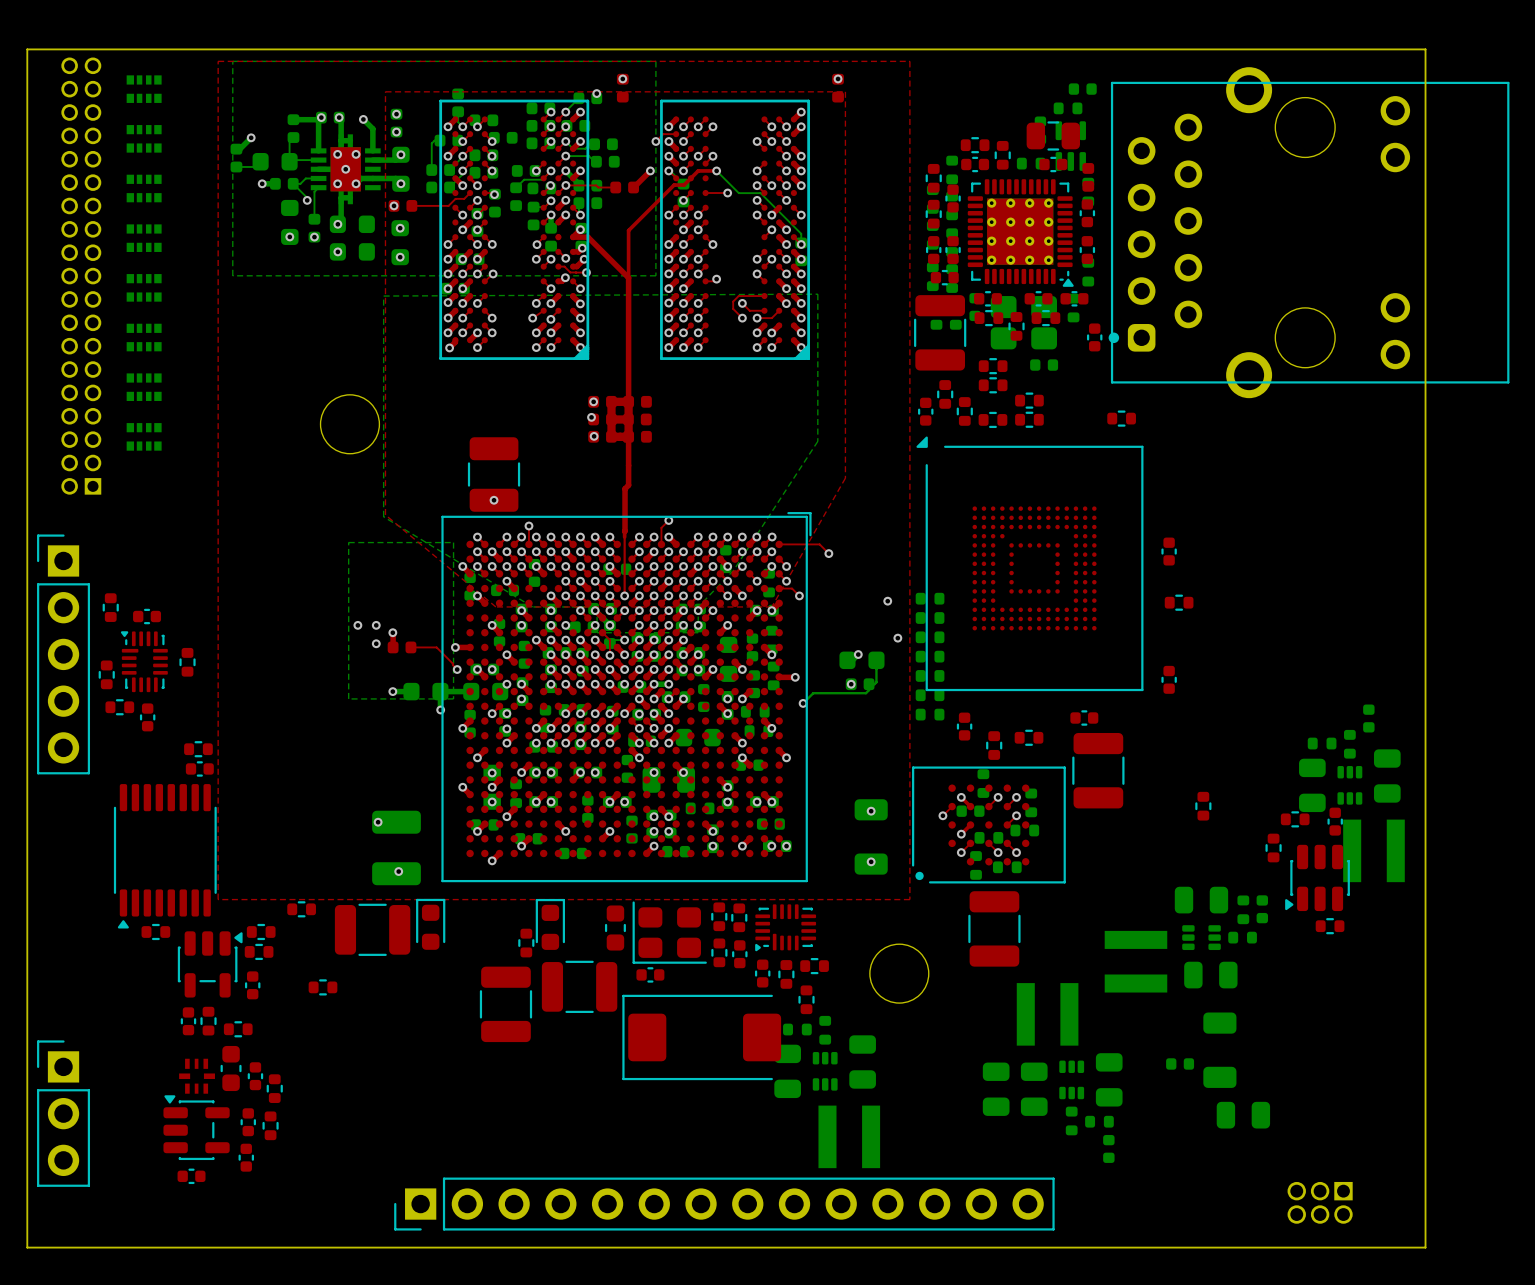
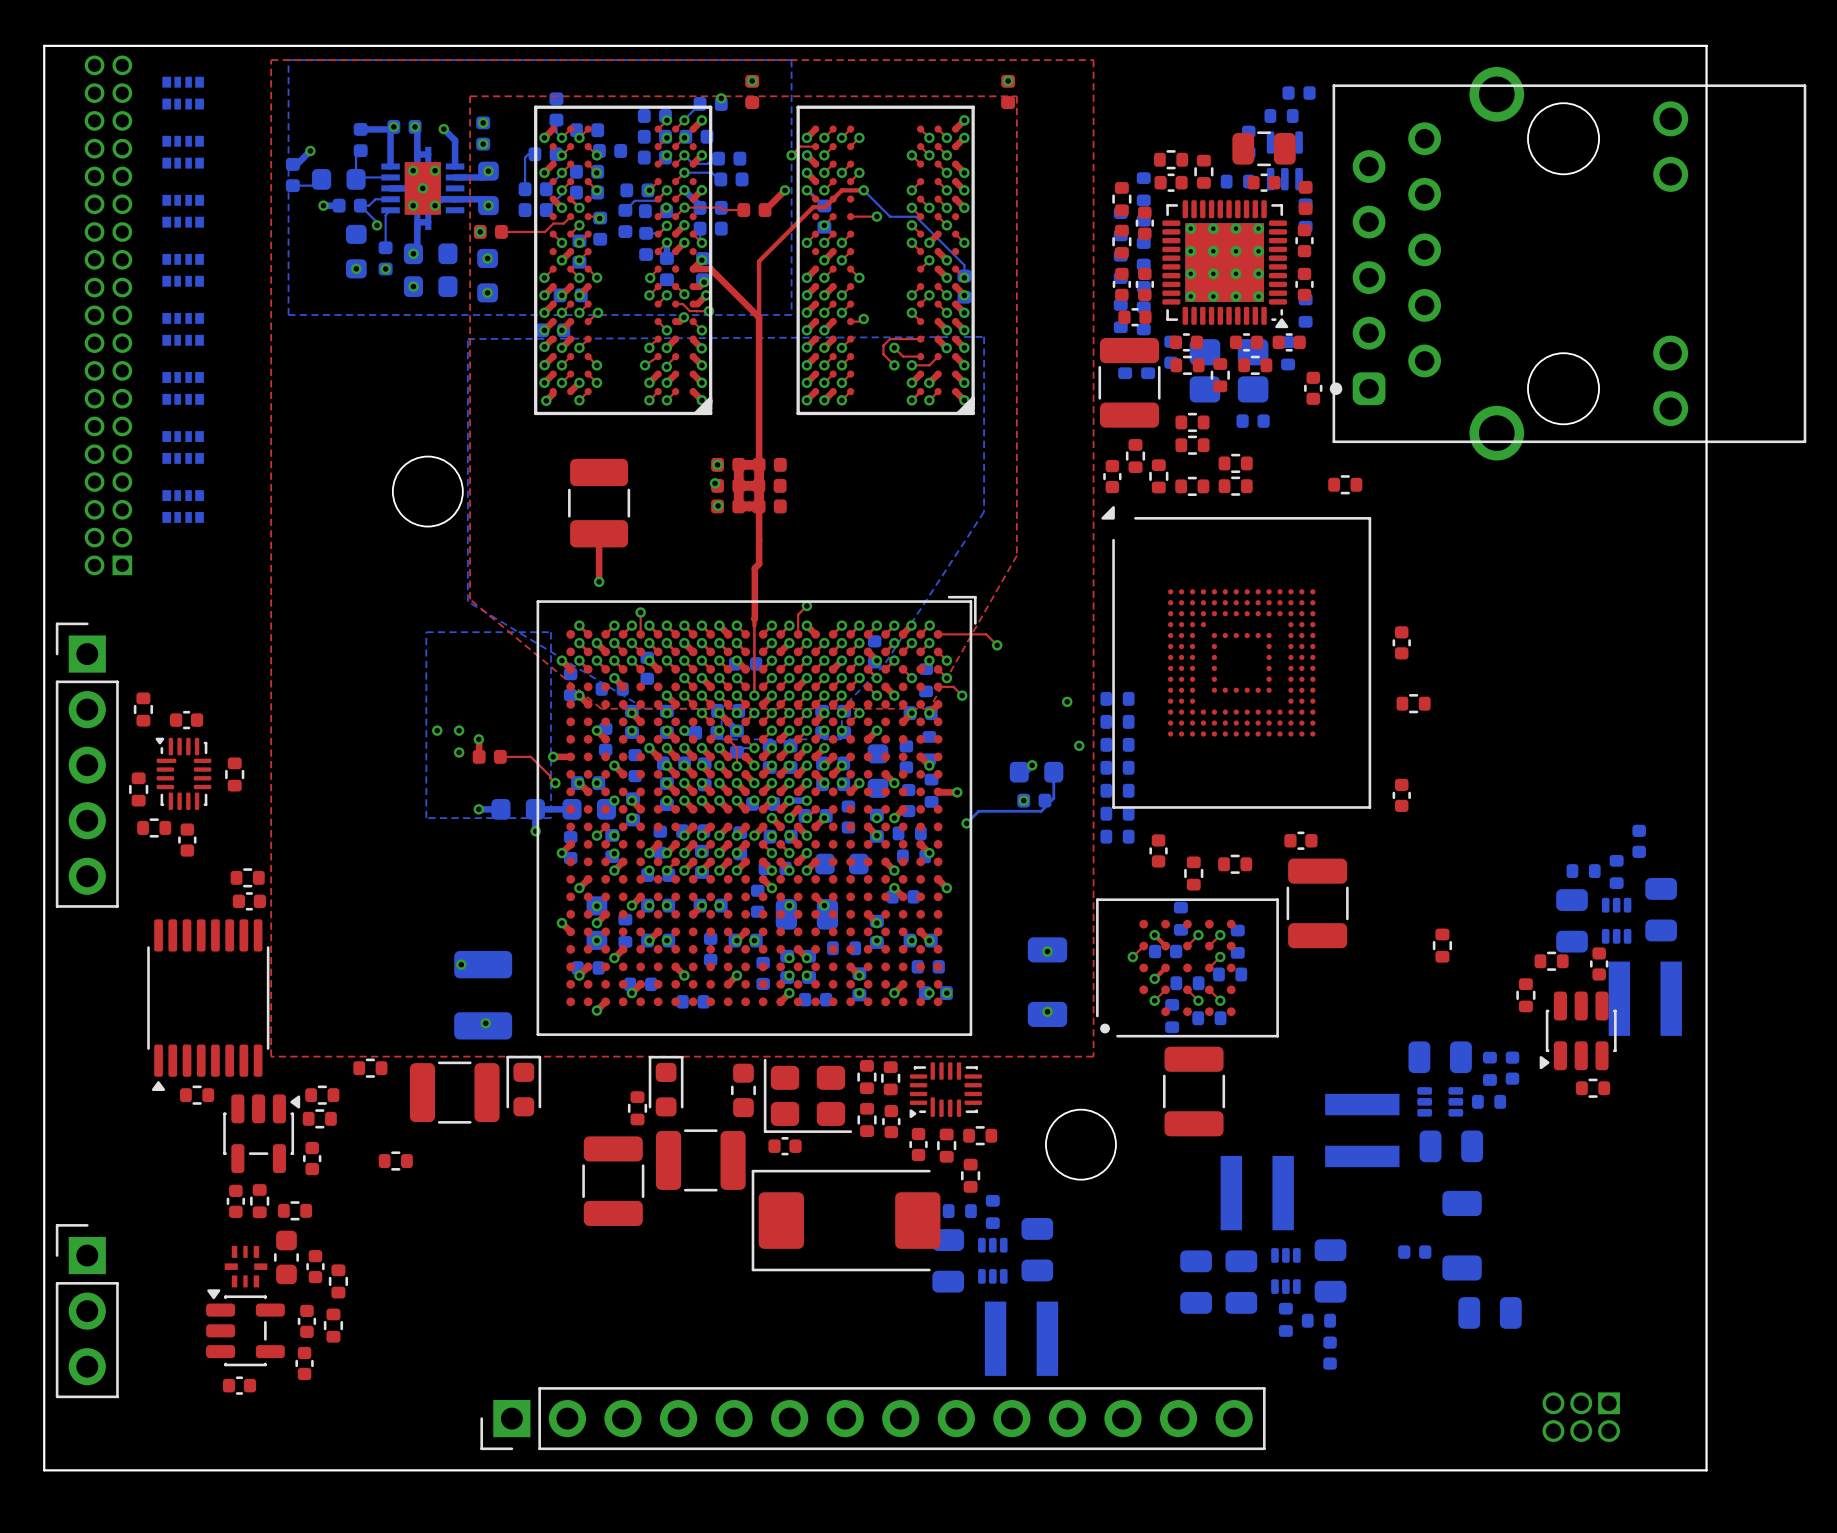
top track: none -> (599, 533) (599, 581)
part position: (494, 474) -> (599, 503)

